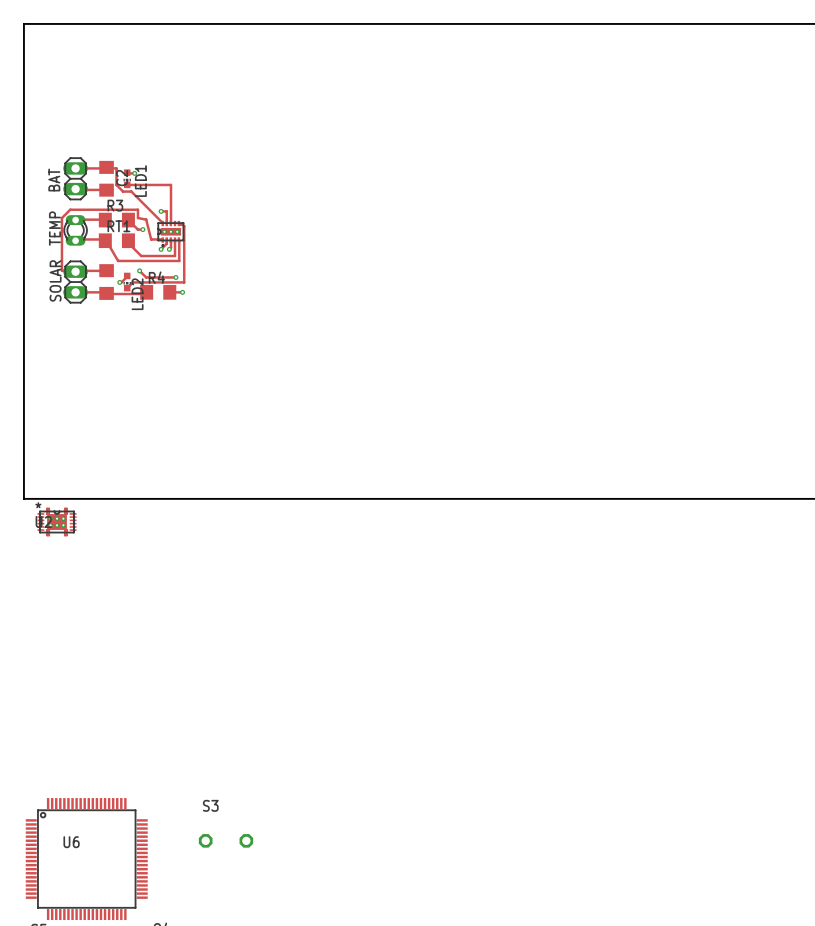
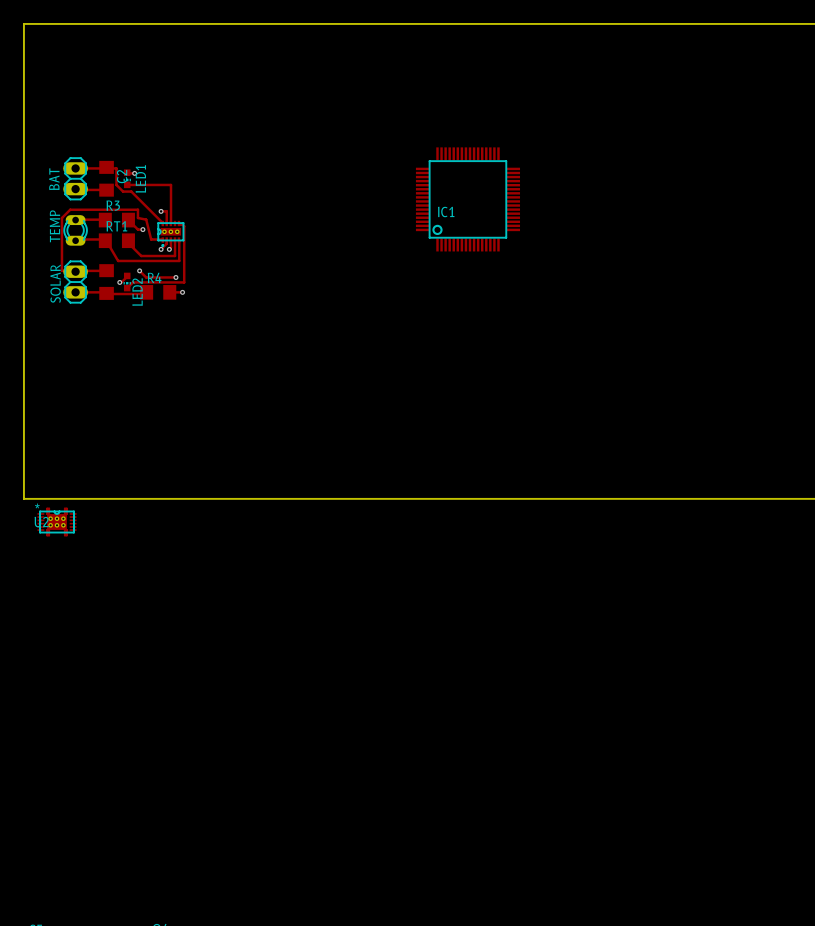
IC1: none -> (467, 199)
S3: (226, 840) -> none
U6: (86, 859) -> none

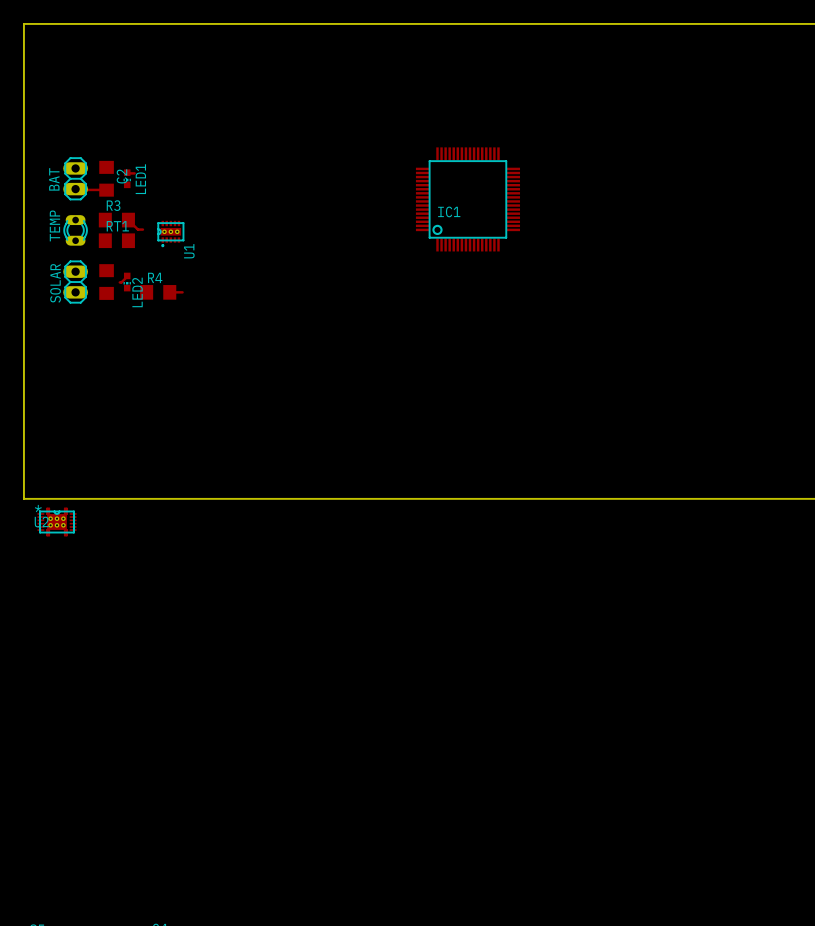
track: (75, 168) (116, 168) (116, 184) (123, 191) (131, 191) (162, 223) -> none
via: (134, 173) -> none
track: (127, 184) (171, 184) (170, 223) -> none
track: (161, 211) (166, 211) (166, 223) -> none
via: (161, 211) -> none
track: (75, 220) (105, 220) -> none
track: (178, 223) (184, 226) (184, 282) (133, 282) (127, 288) -> none
via: (142, 229) -> none
track: (162, 240) (151, 239) (146, 219) (137, 218) (137, 209) (70, 209) (61, 218) (61, 270) (106, 270) -> none
track: (166, 240) (166, 243) (161, 249) -> none
track: (170, 240) (169, 249) -> none
track: (175, 240) (175, 256) (141, 256) (128, 240) -> none
track: (178, 240) (179, 260) (118, 260) (104, 239) (75, 240) -> none
via: (161, 249) -> none
via: (169, 249) -> none
U1 name: none -> U1 (189, 251)
track: (139, 270) (146, 277) (175, 277) -> none
via: (139, 270) -> none
via: (175, 277) -> none
via: (119, 282) -> none
track: (75, 292) (106, 292) (106, 294) (144, 294) (146, 292) -> none
via: (182, 292) -> none

